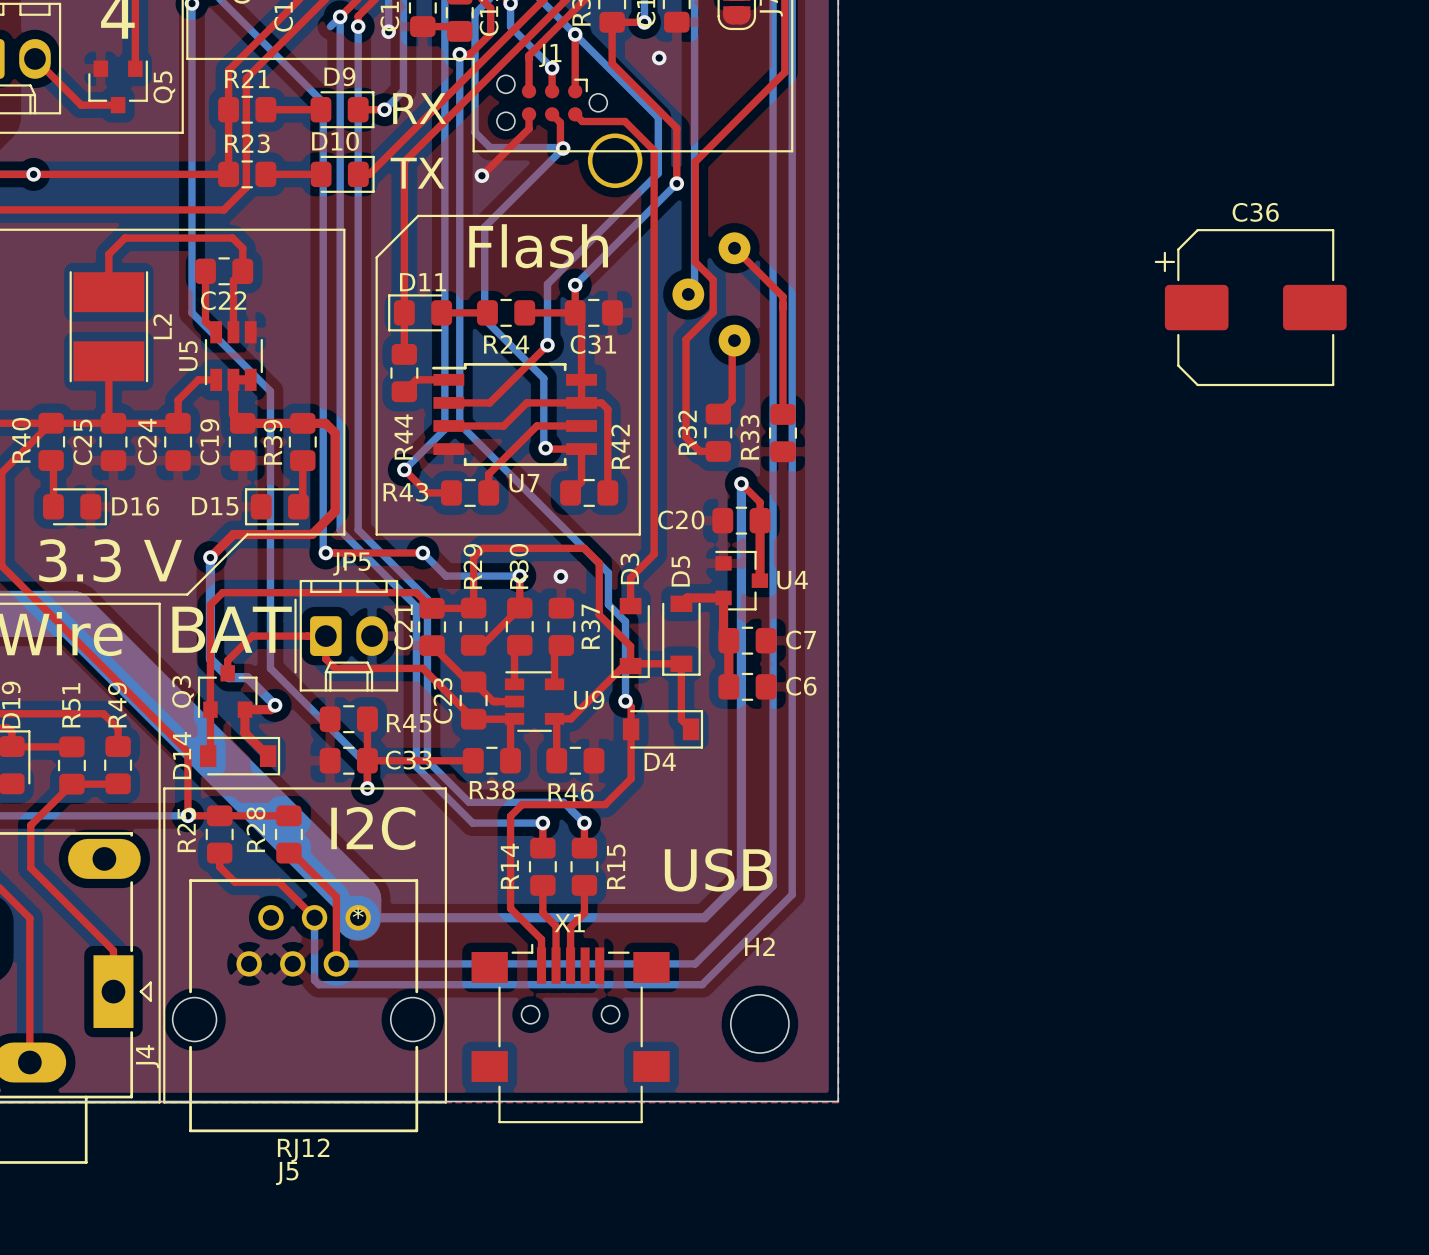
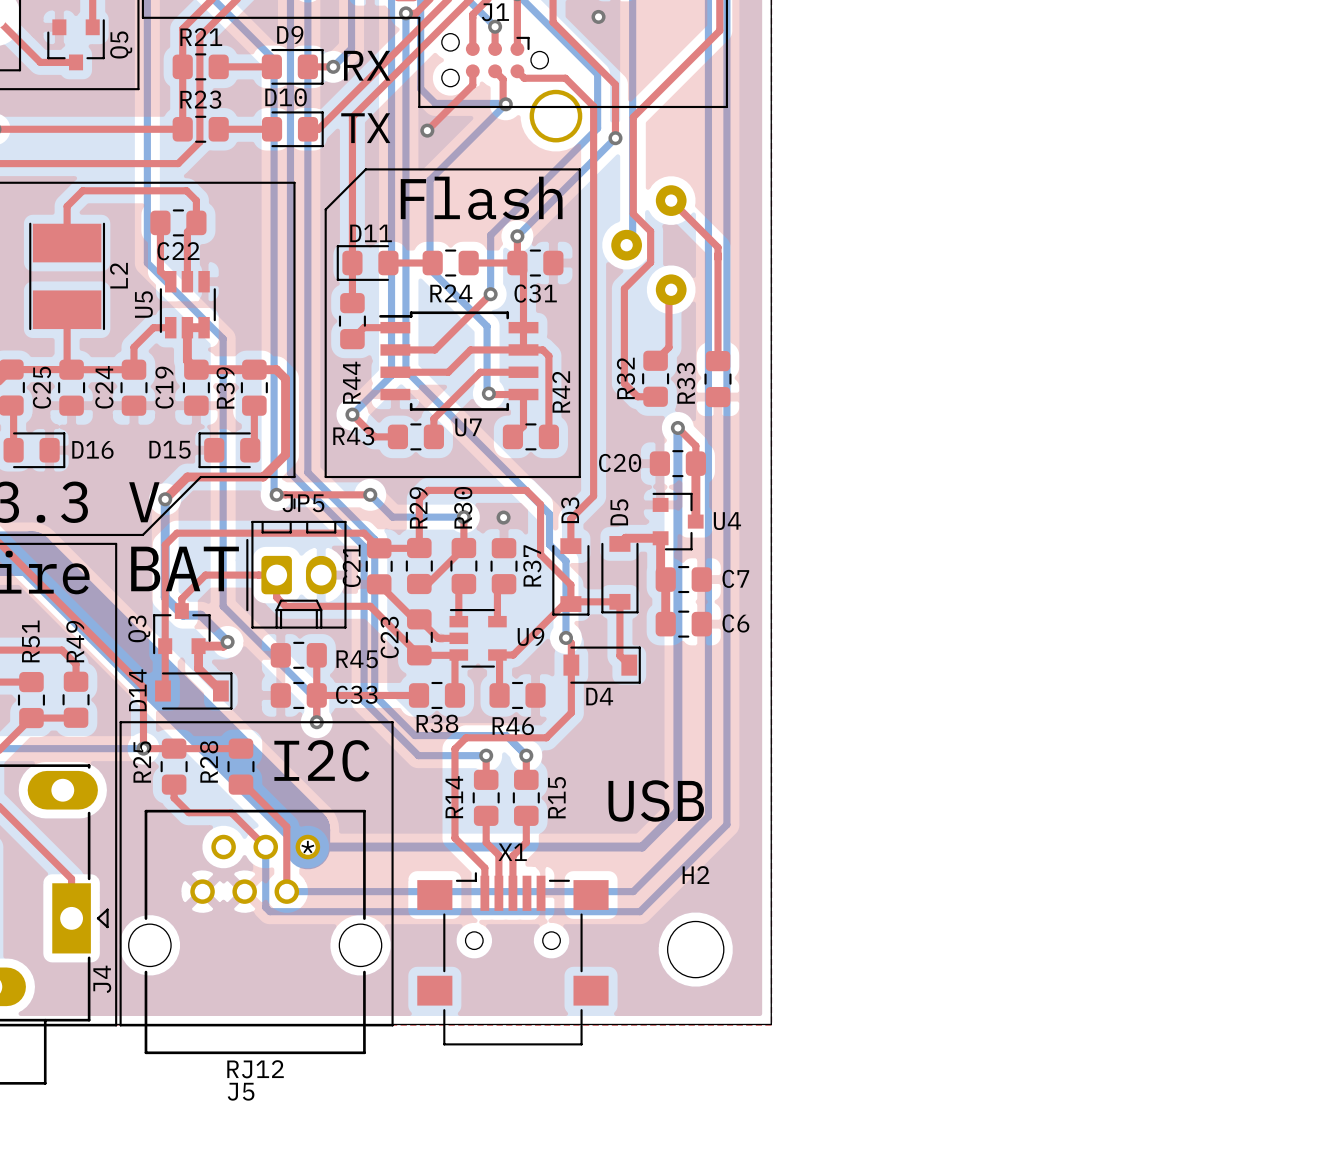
C36: (1250, 307) -> none

